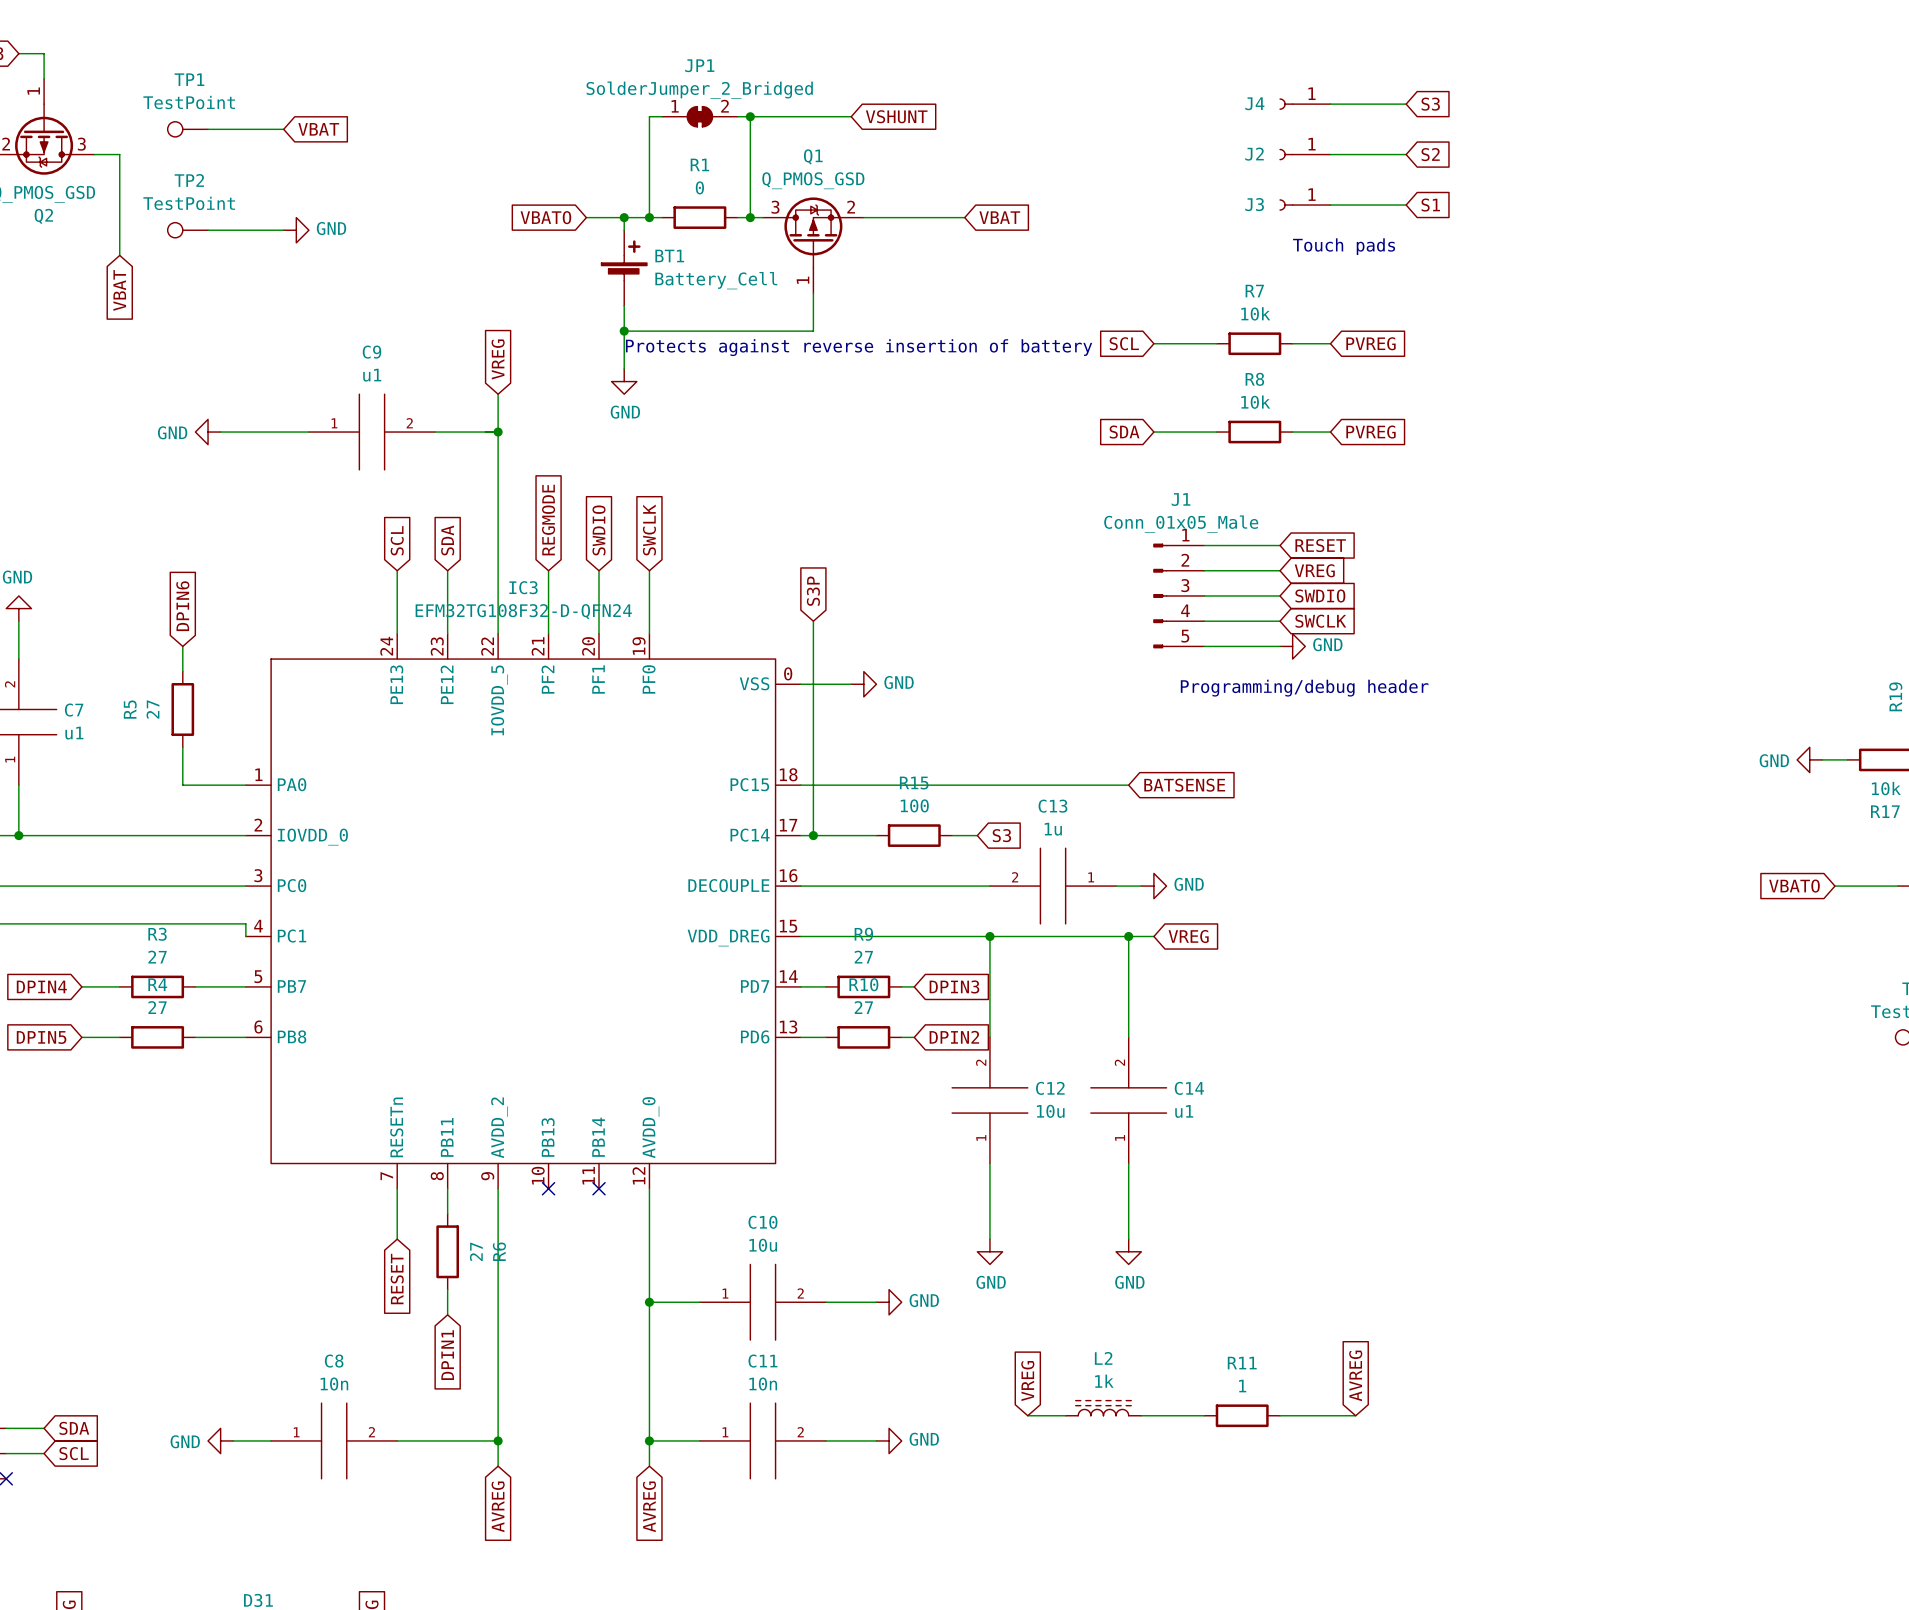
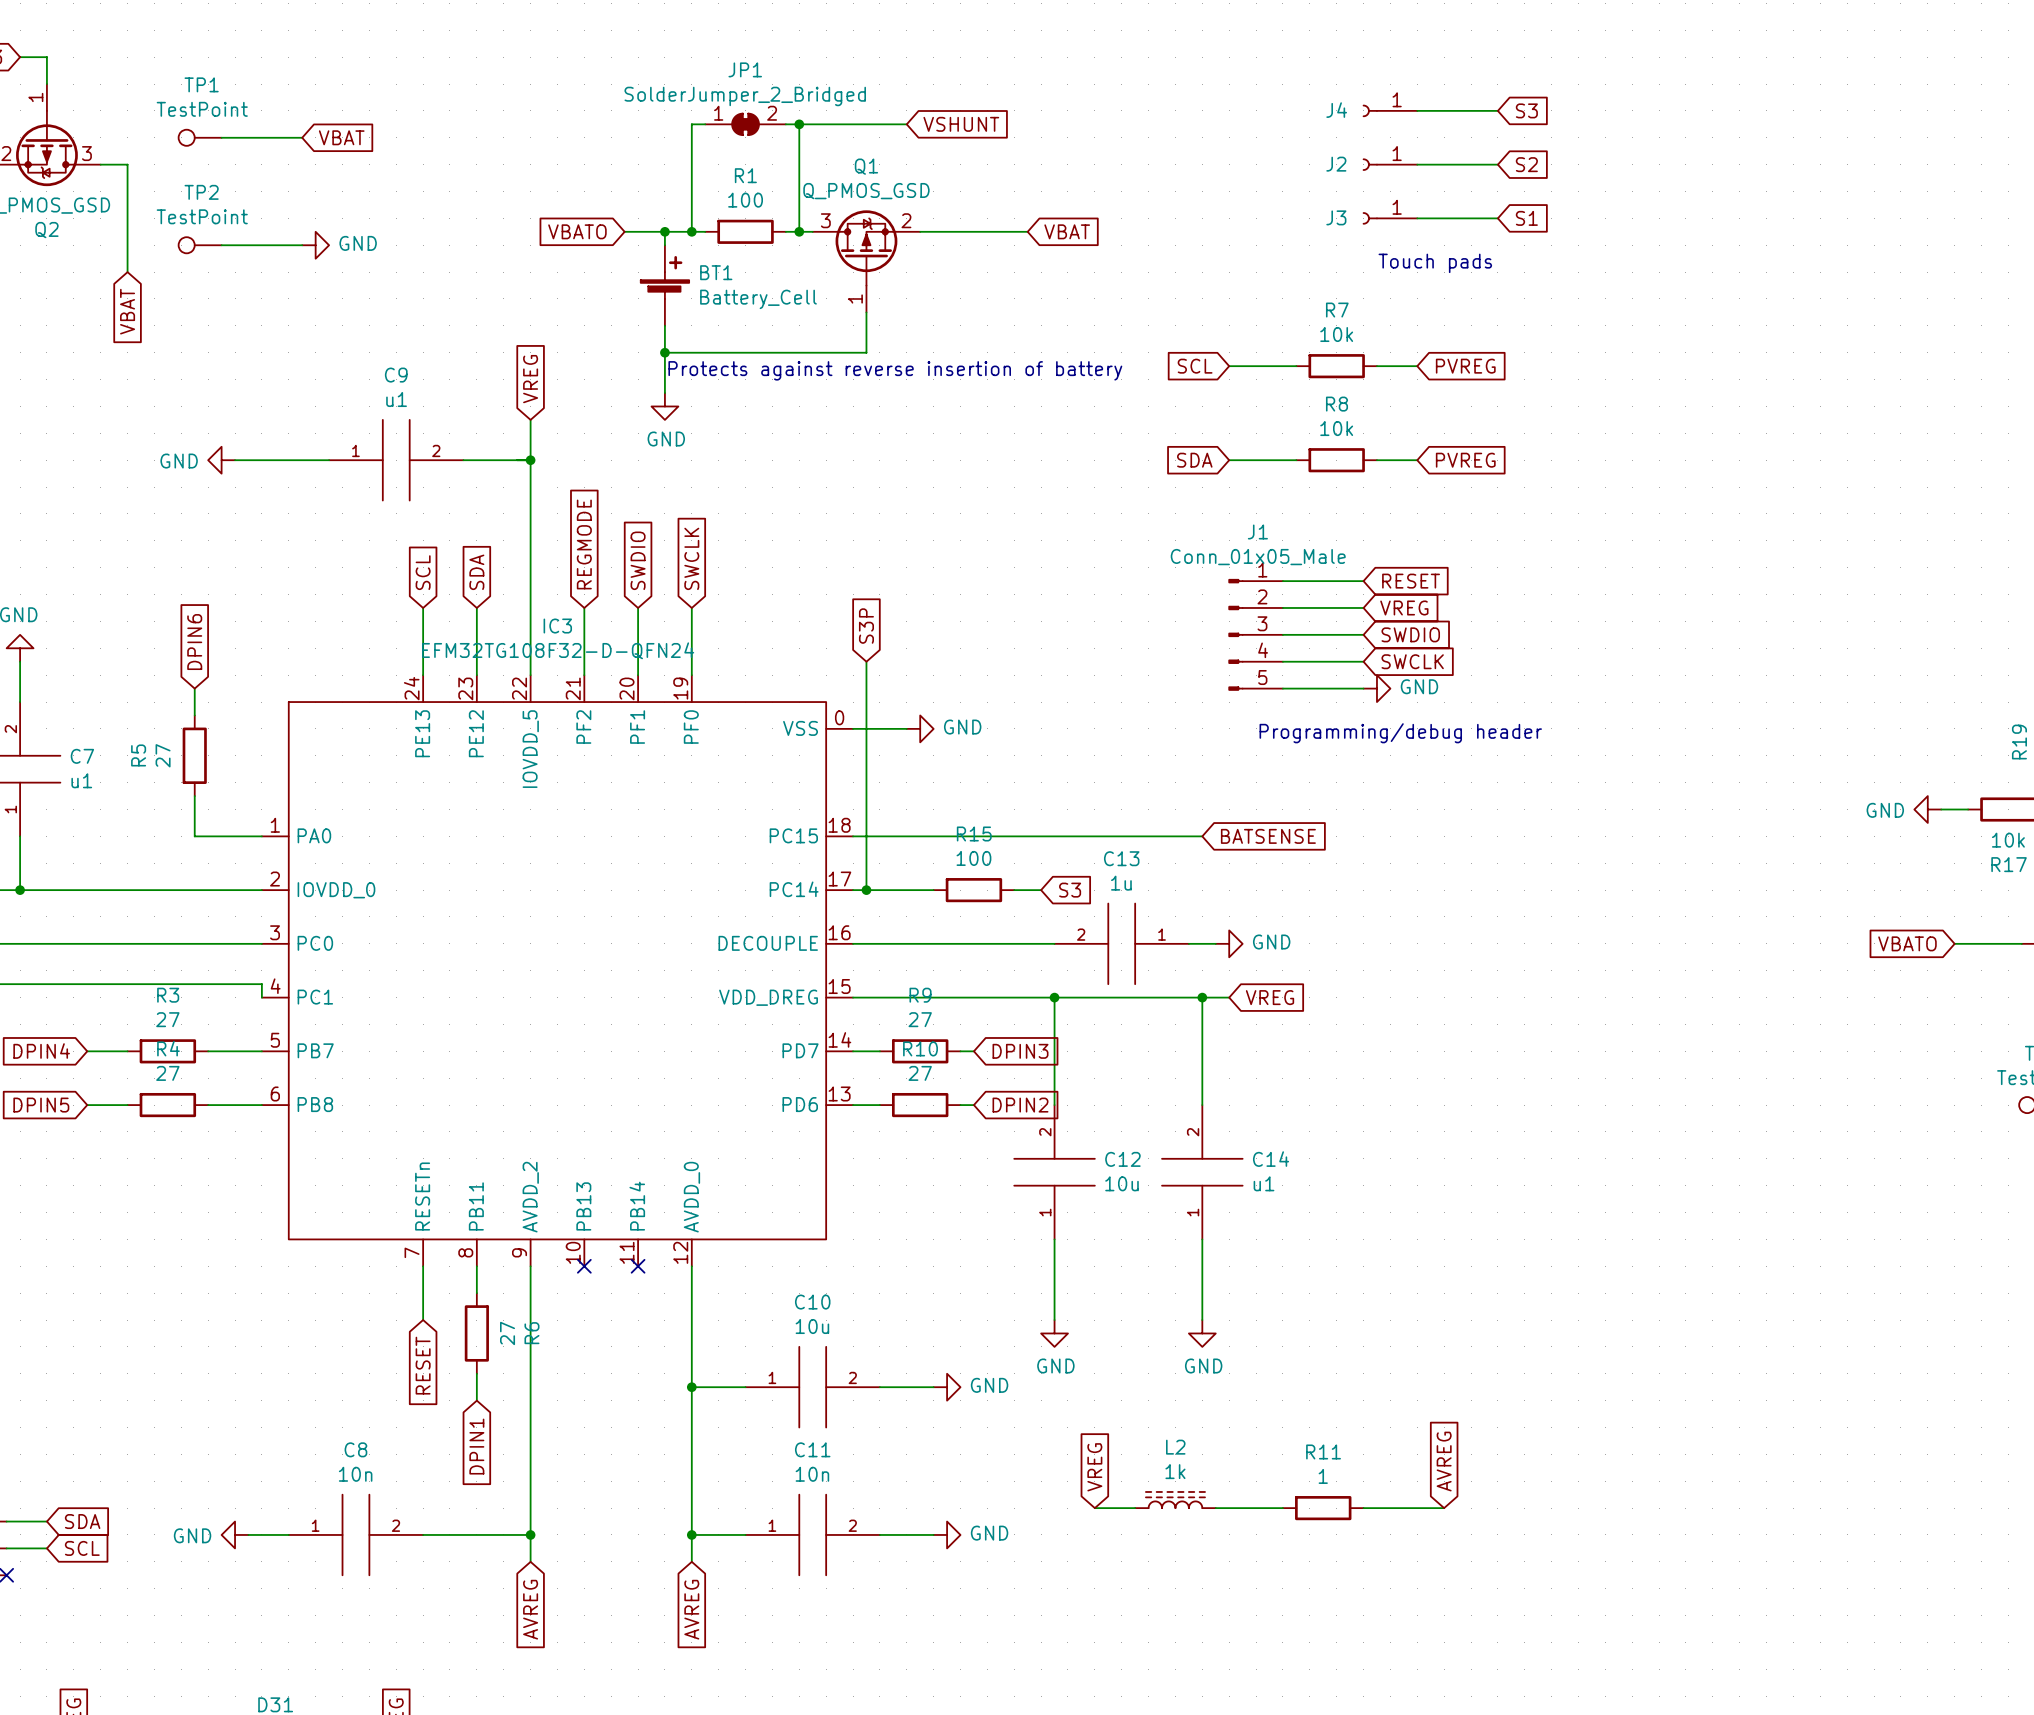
R1 value: 0 (699, 187) -> 100 (745, 200)

